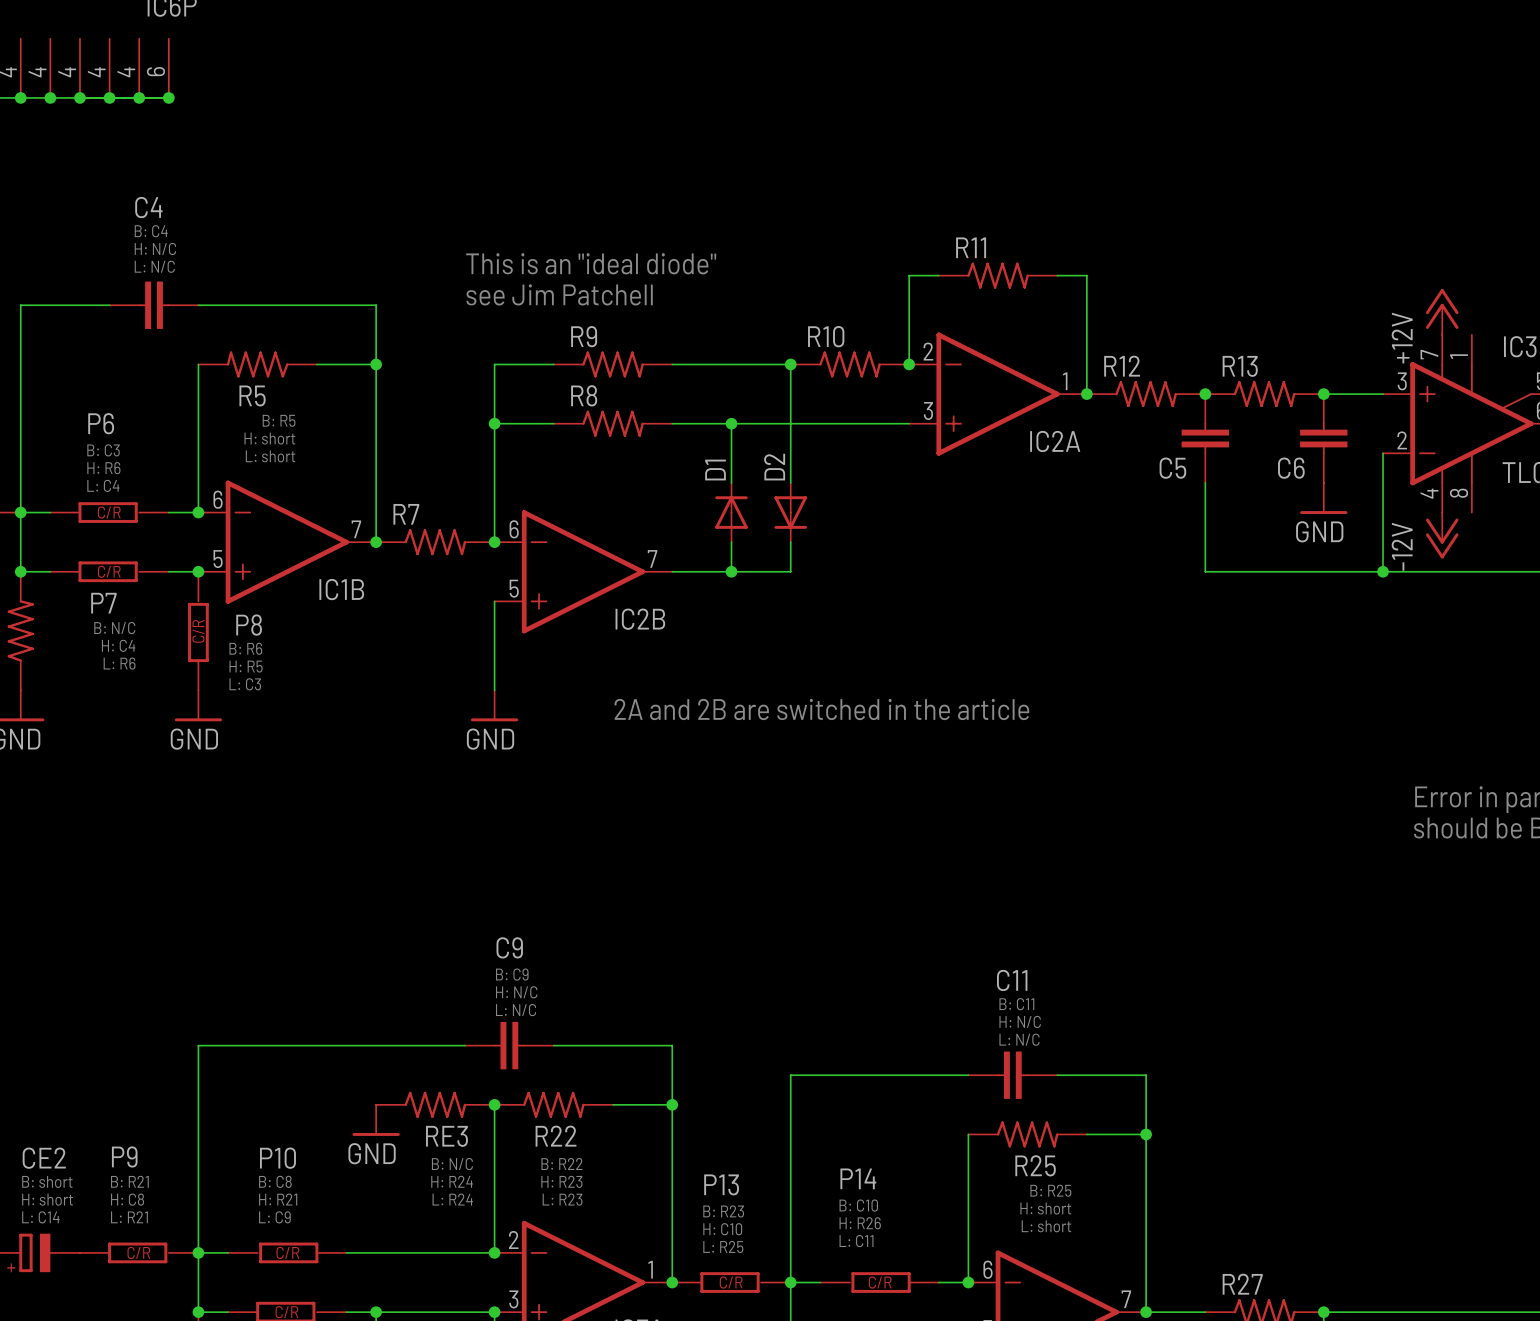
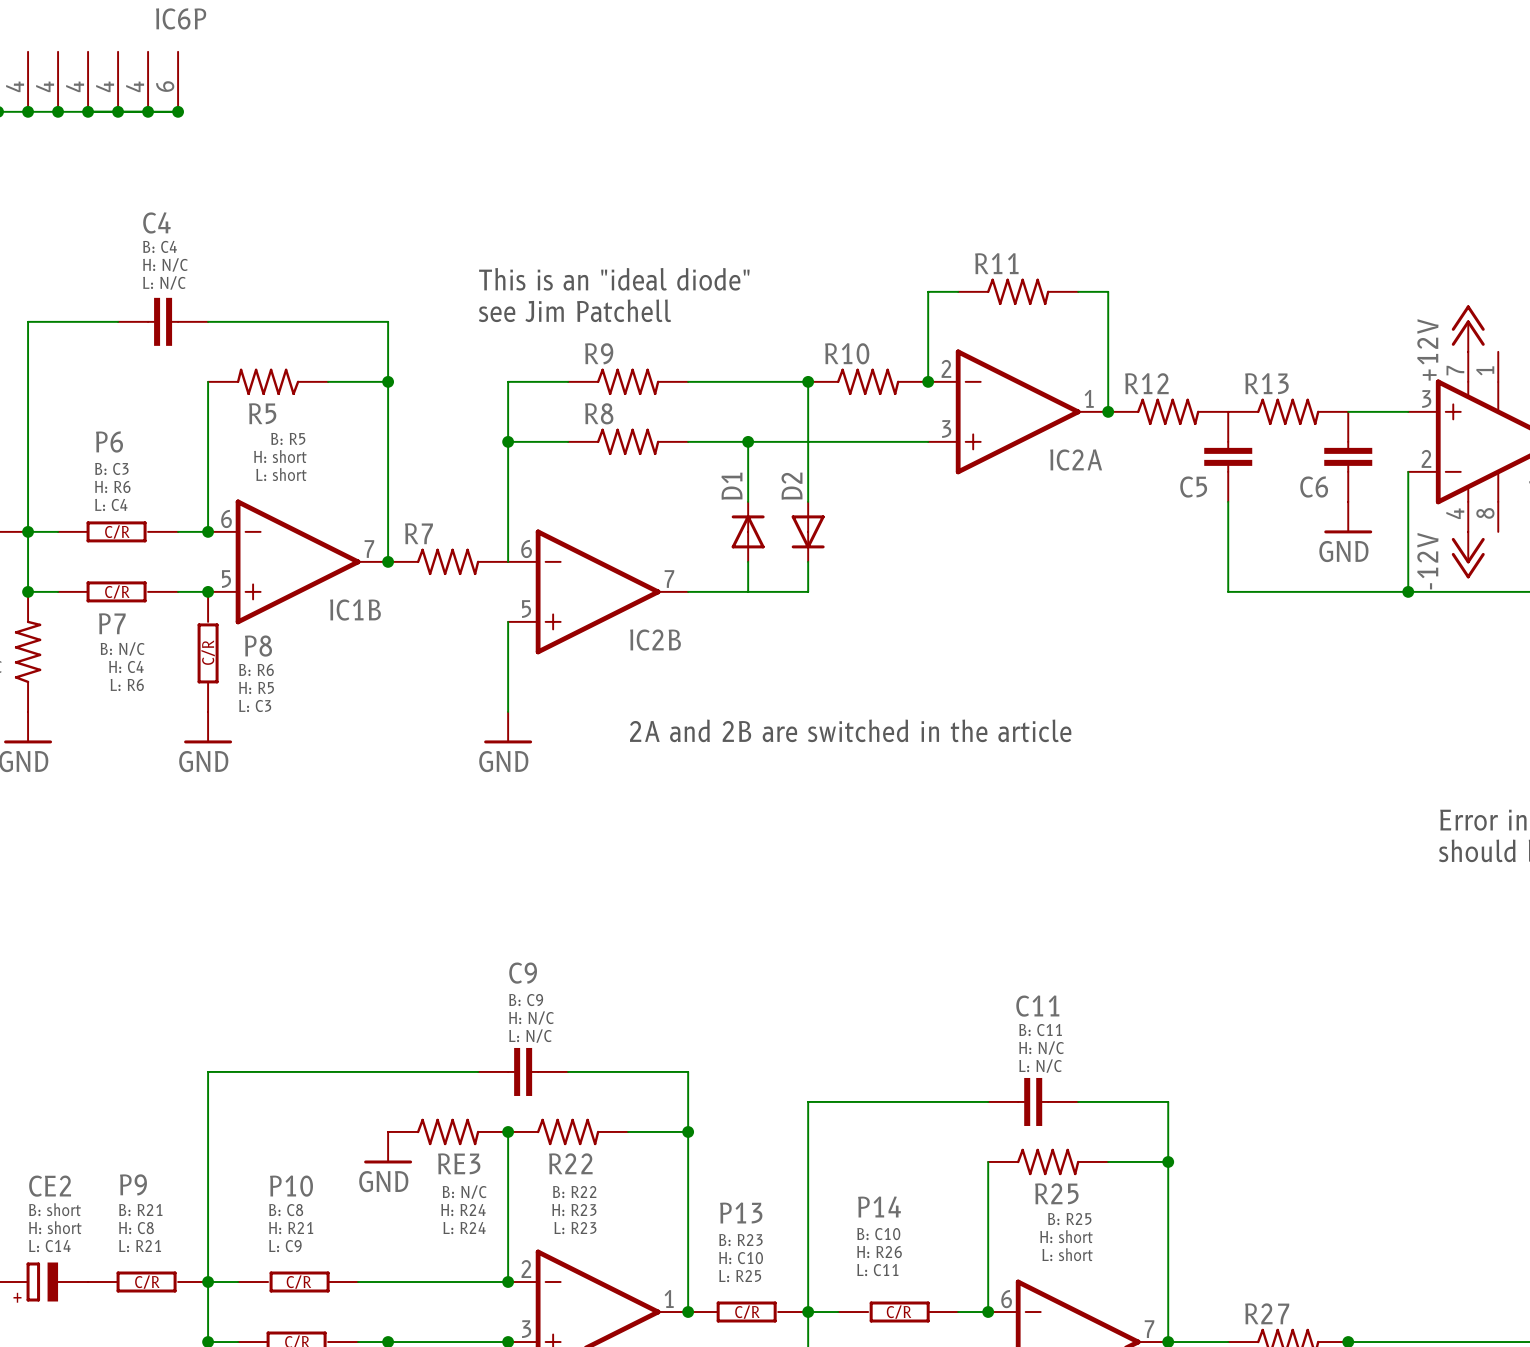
junction: (1205, 394) -> none
junction: (1323, 394) -> none
junction: (494, 542) -> none
junction: (731, 571) -> none

